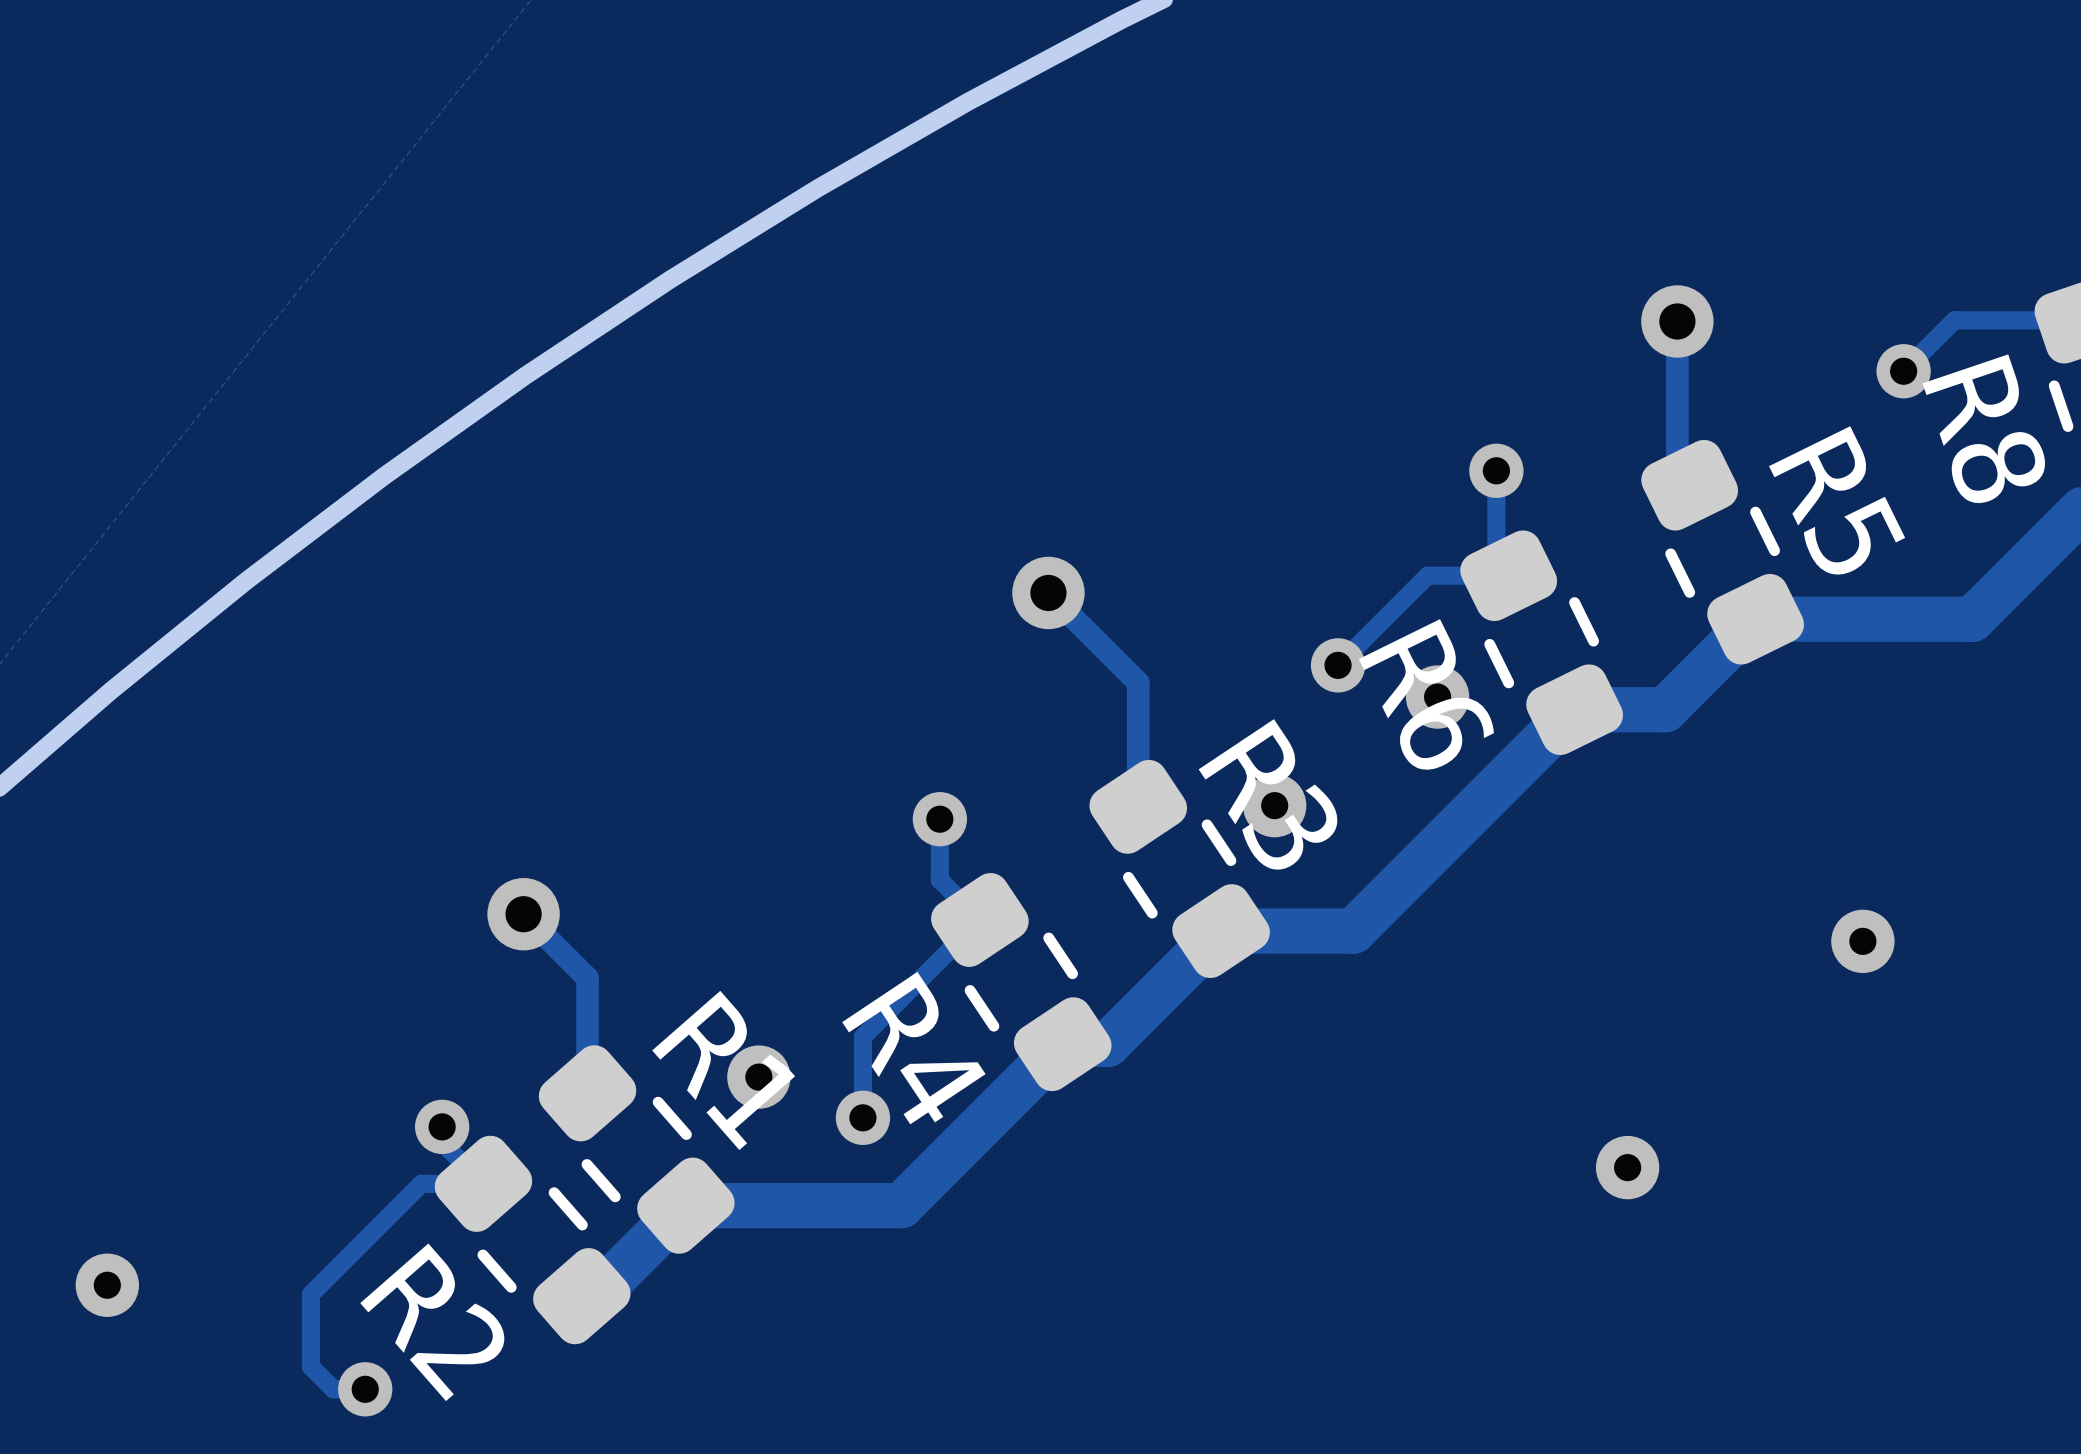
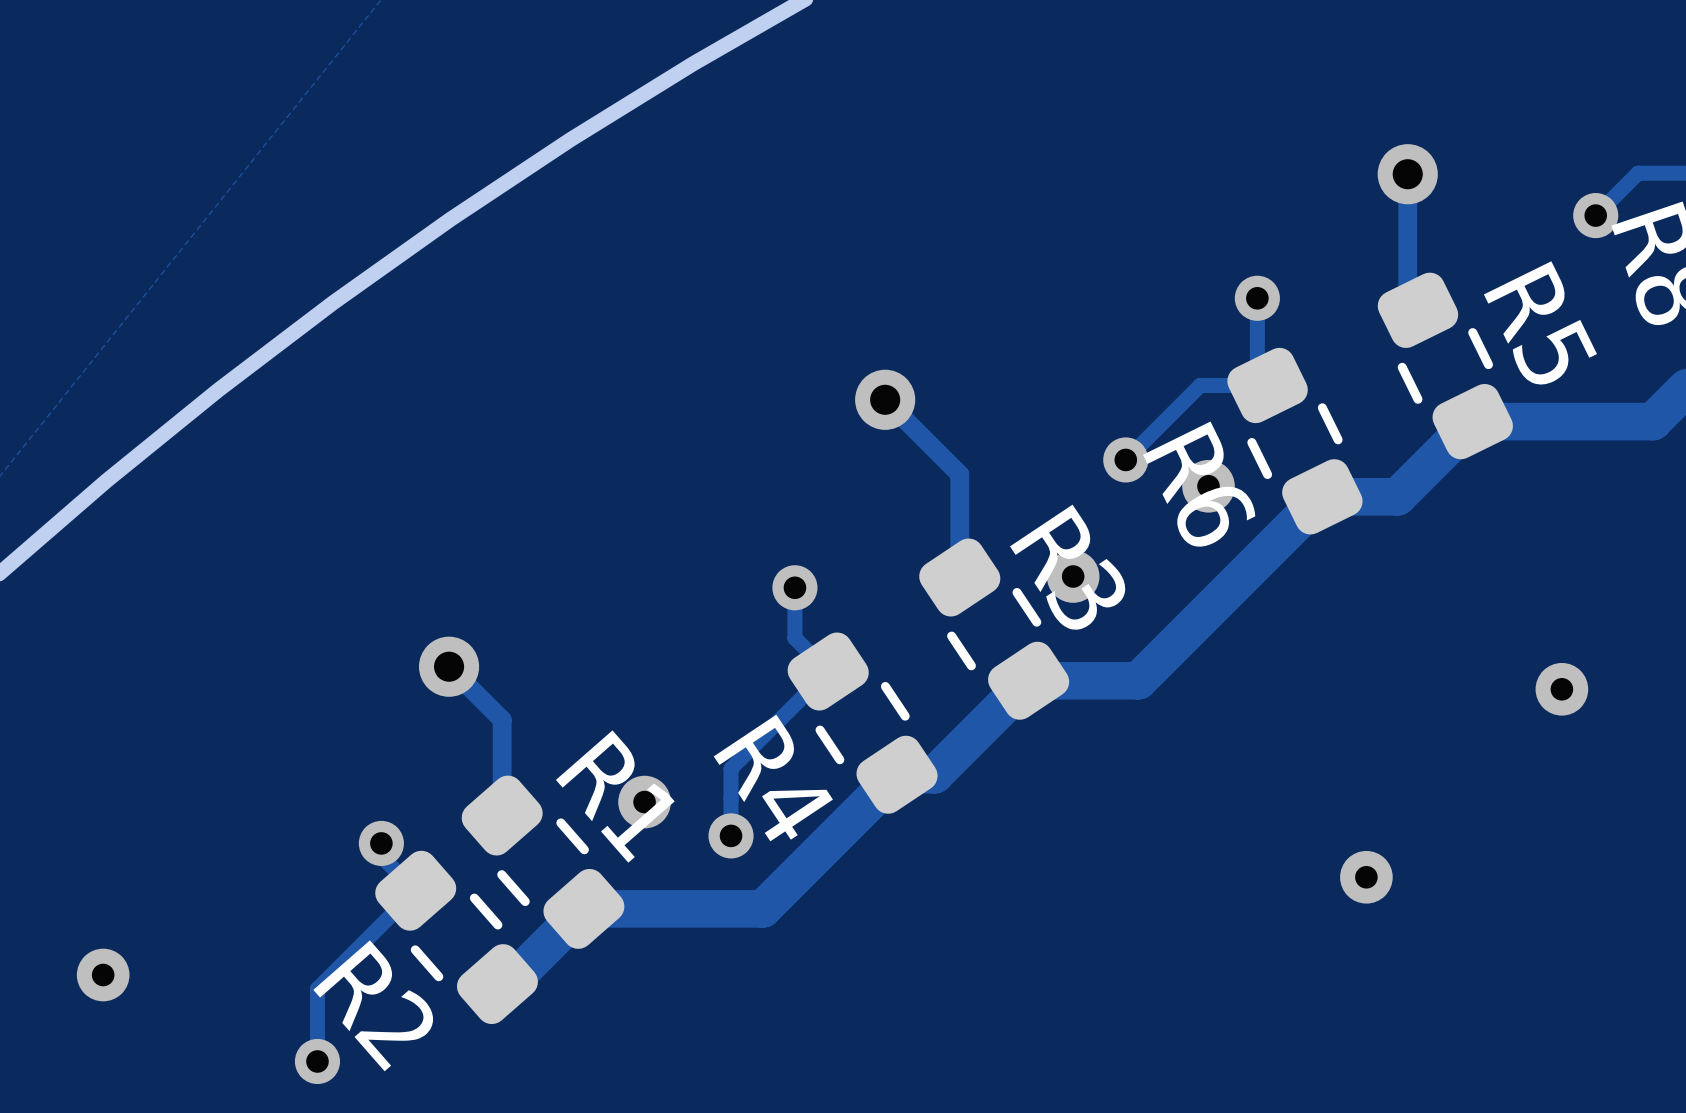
track: (483, 1183) (421, 1183) (310, 1294) (310, 1366) (333, 1389) (365, 1389) -> (415, 890) (317, 988) (317, 1061)

